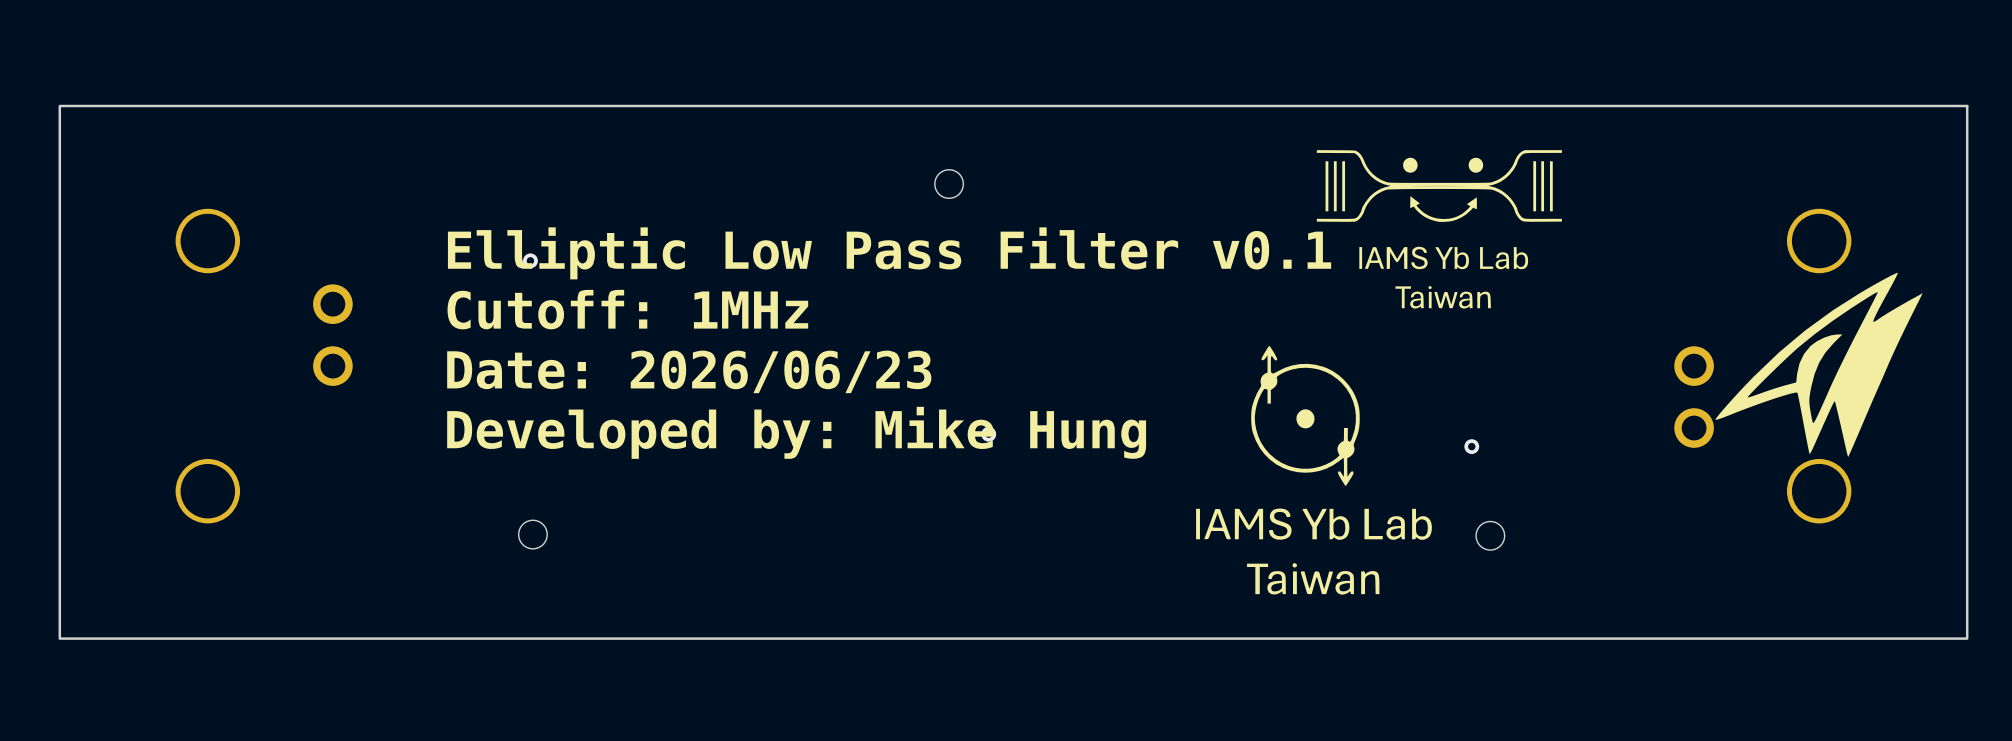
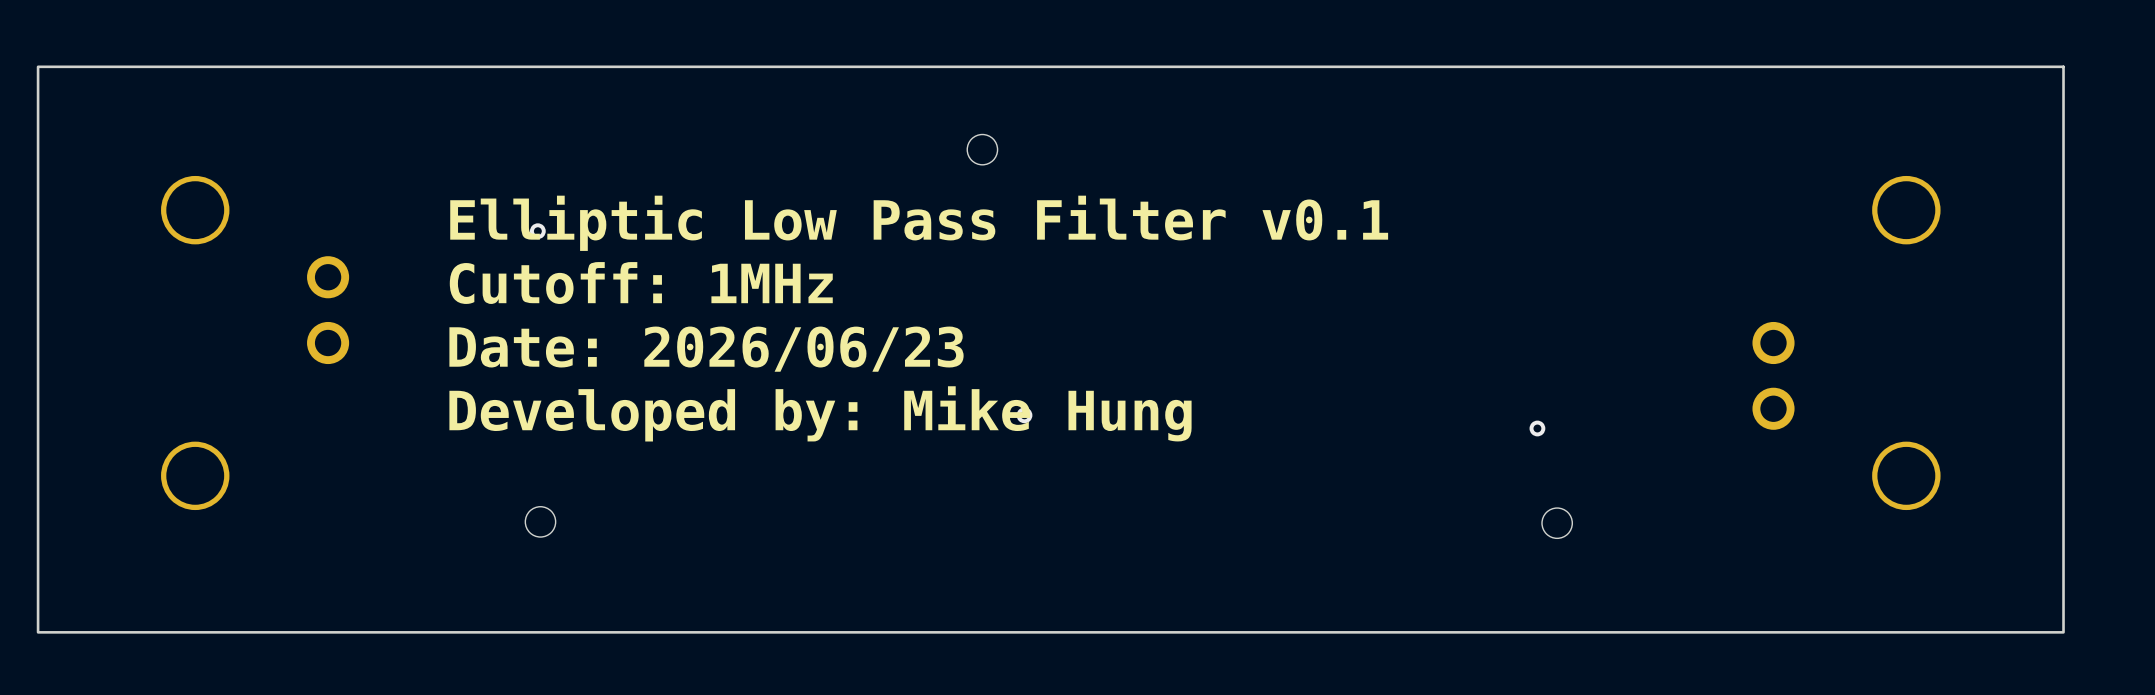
drawing: [1316, 150, 1562, 309] -> none
drawing: [1715, 272, 1923, 457] -> none
drawing: [1196, 345, 1432, 595] -> none

